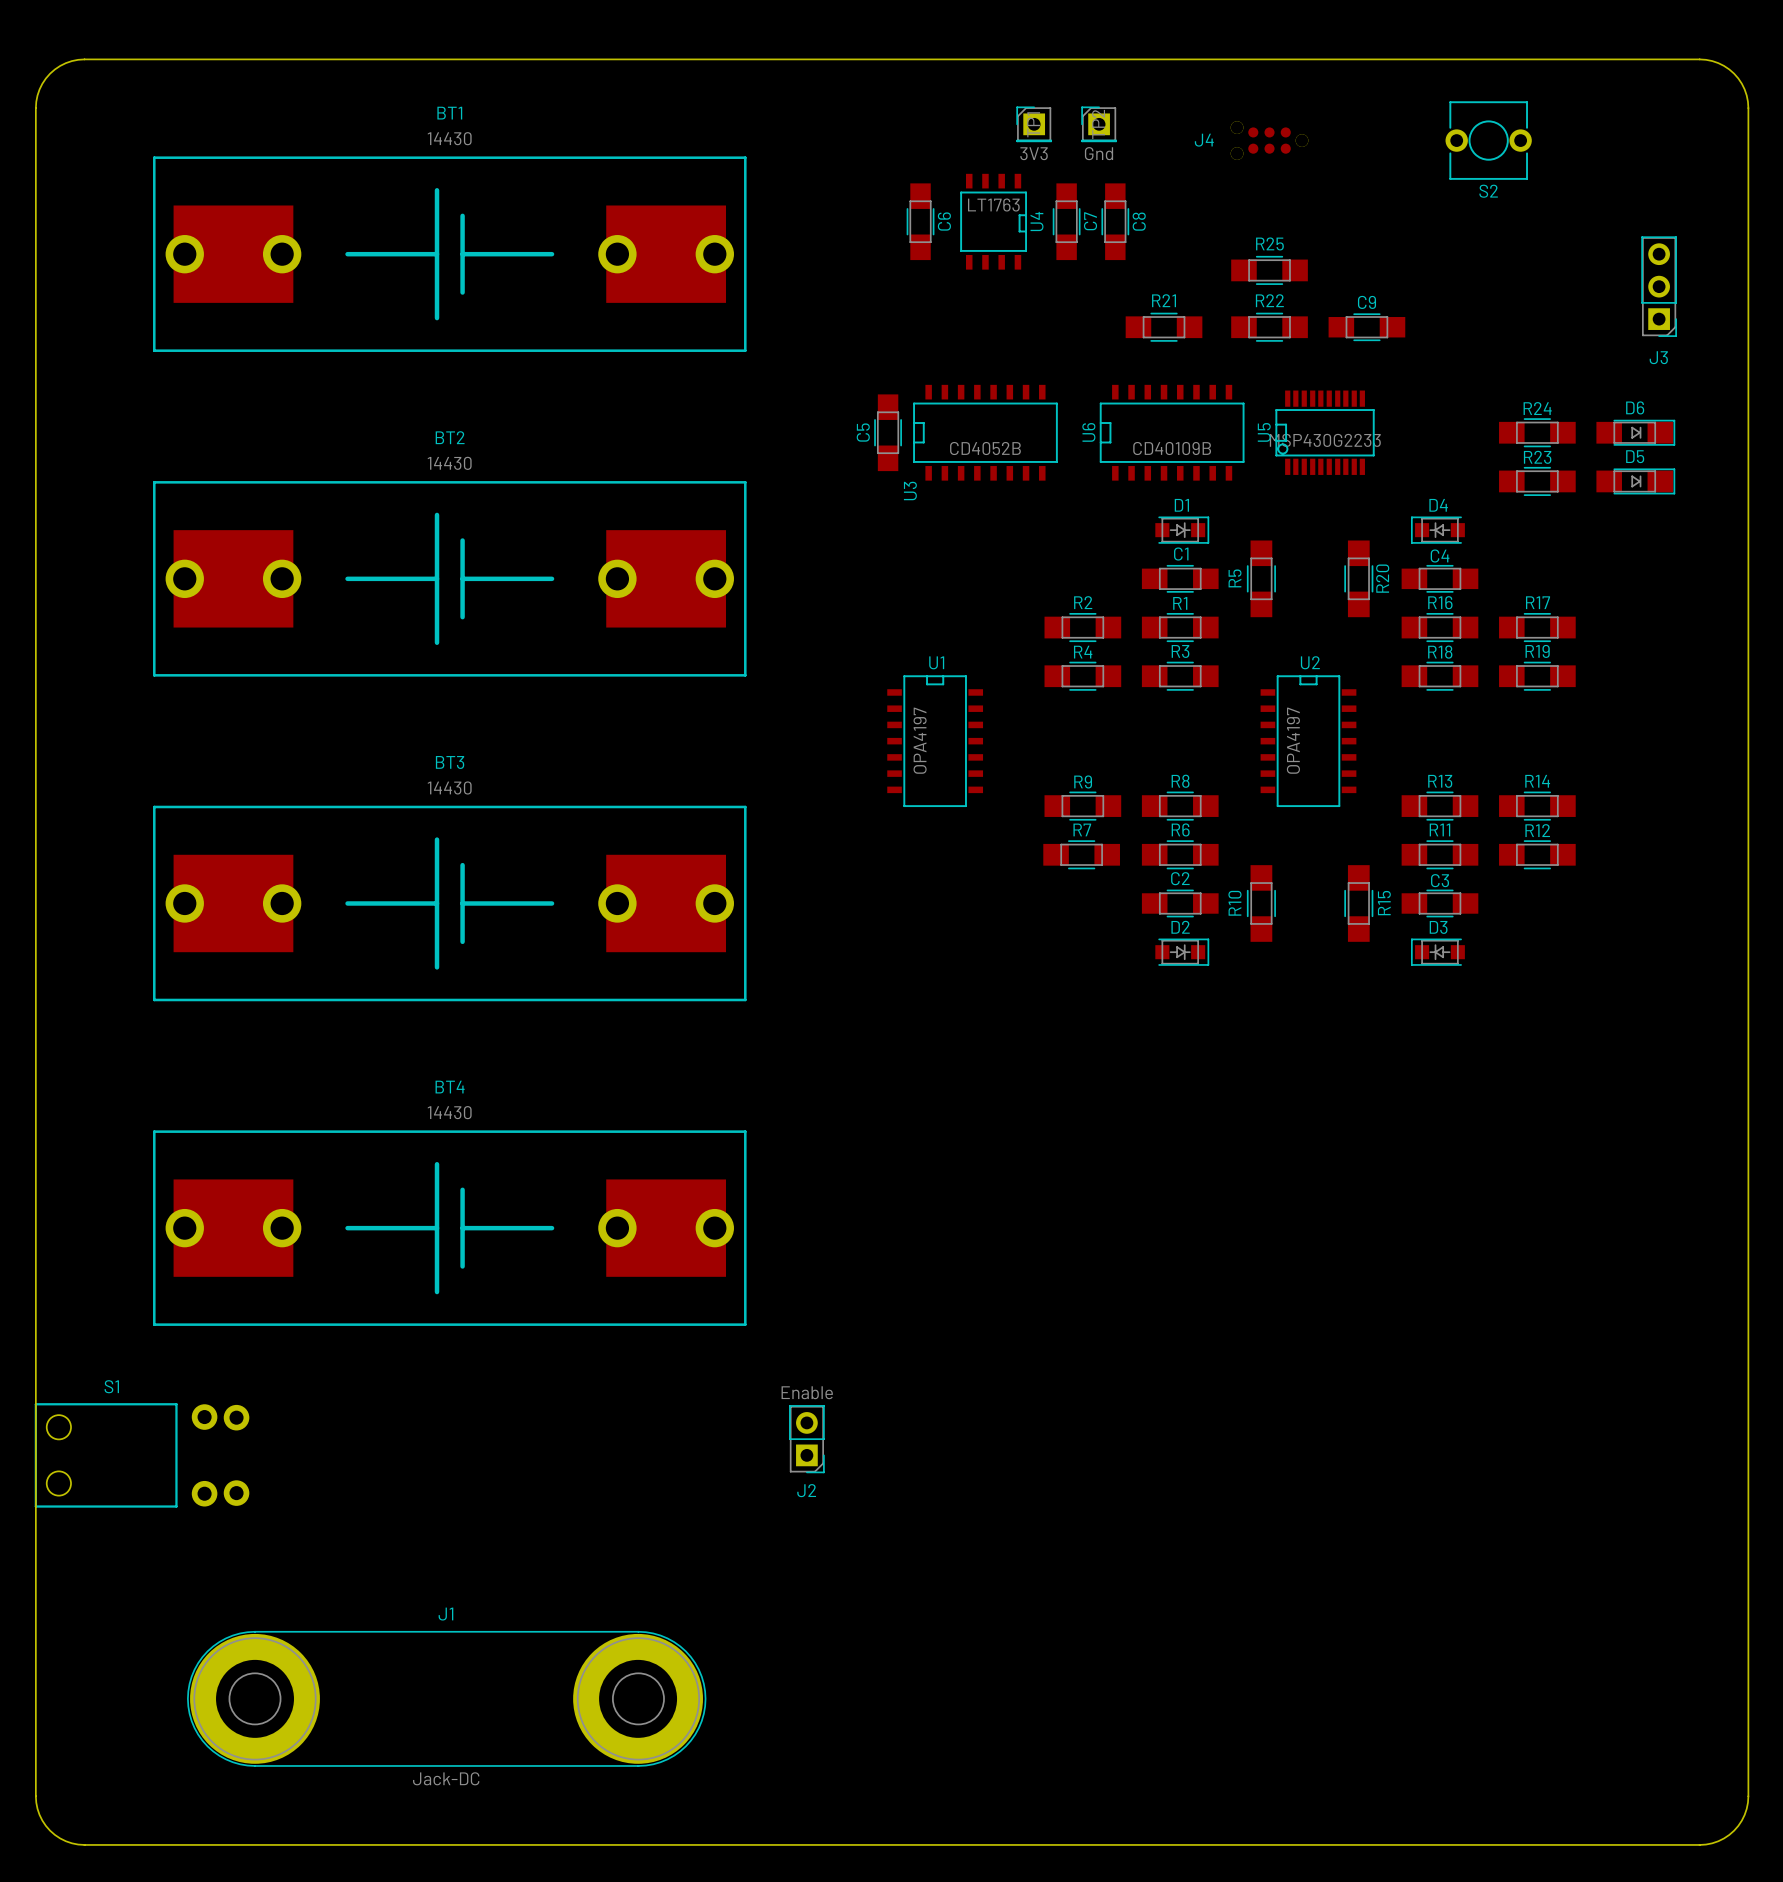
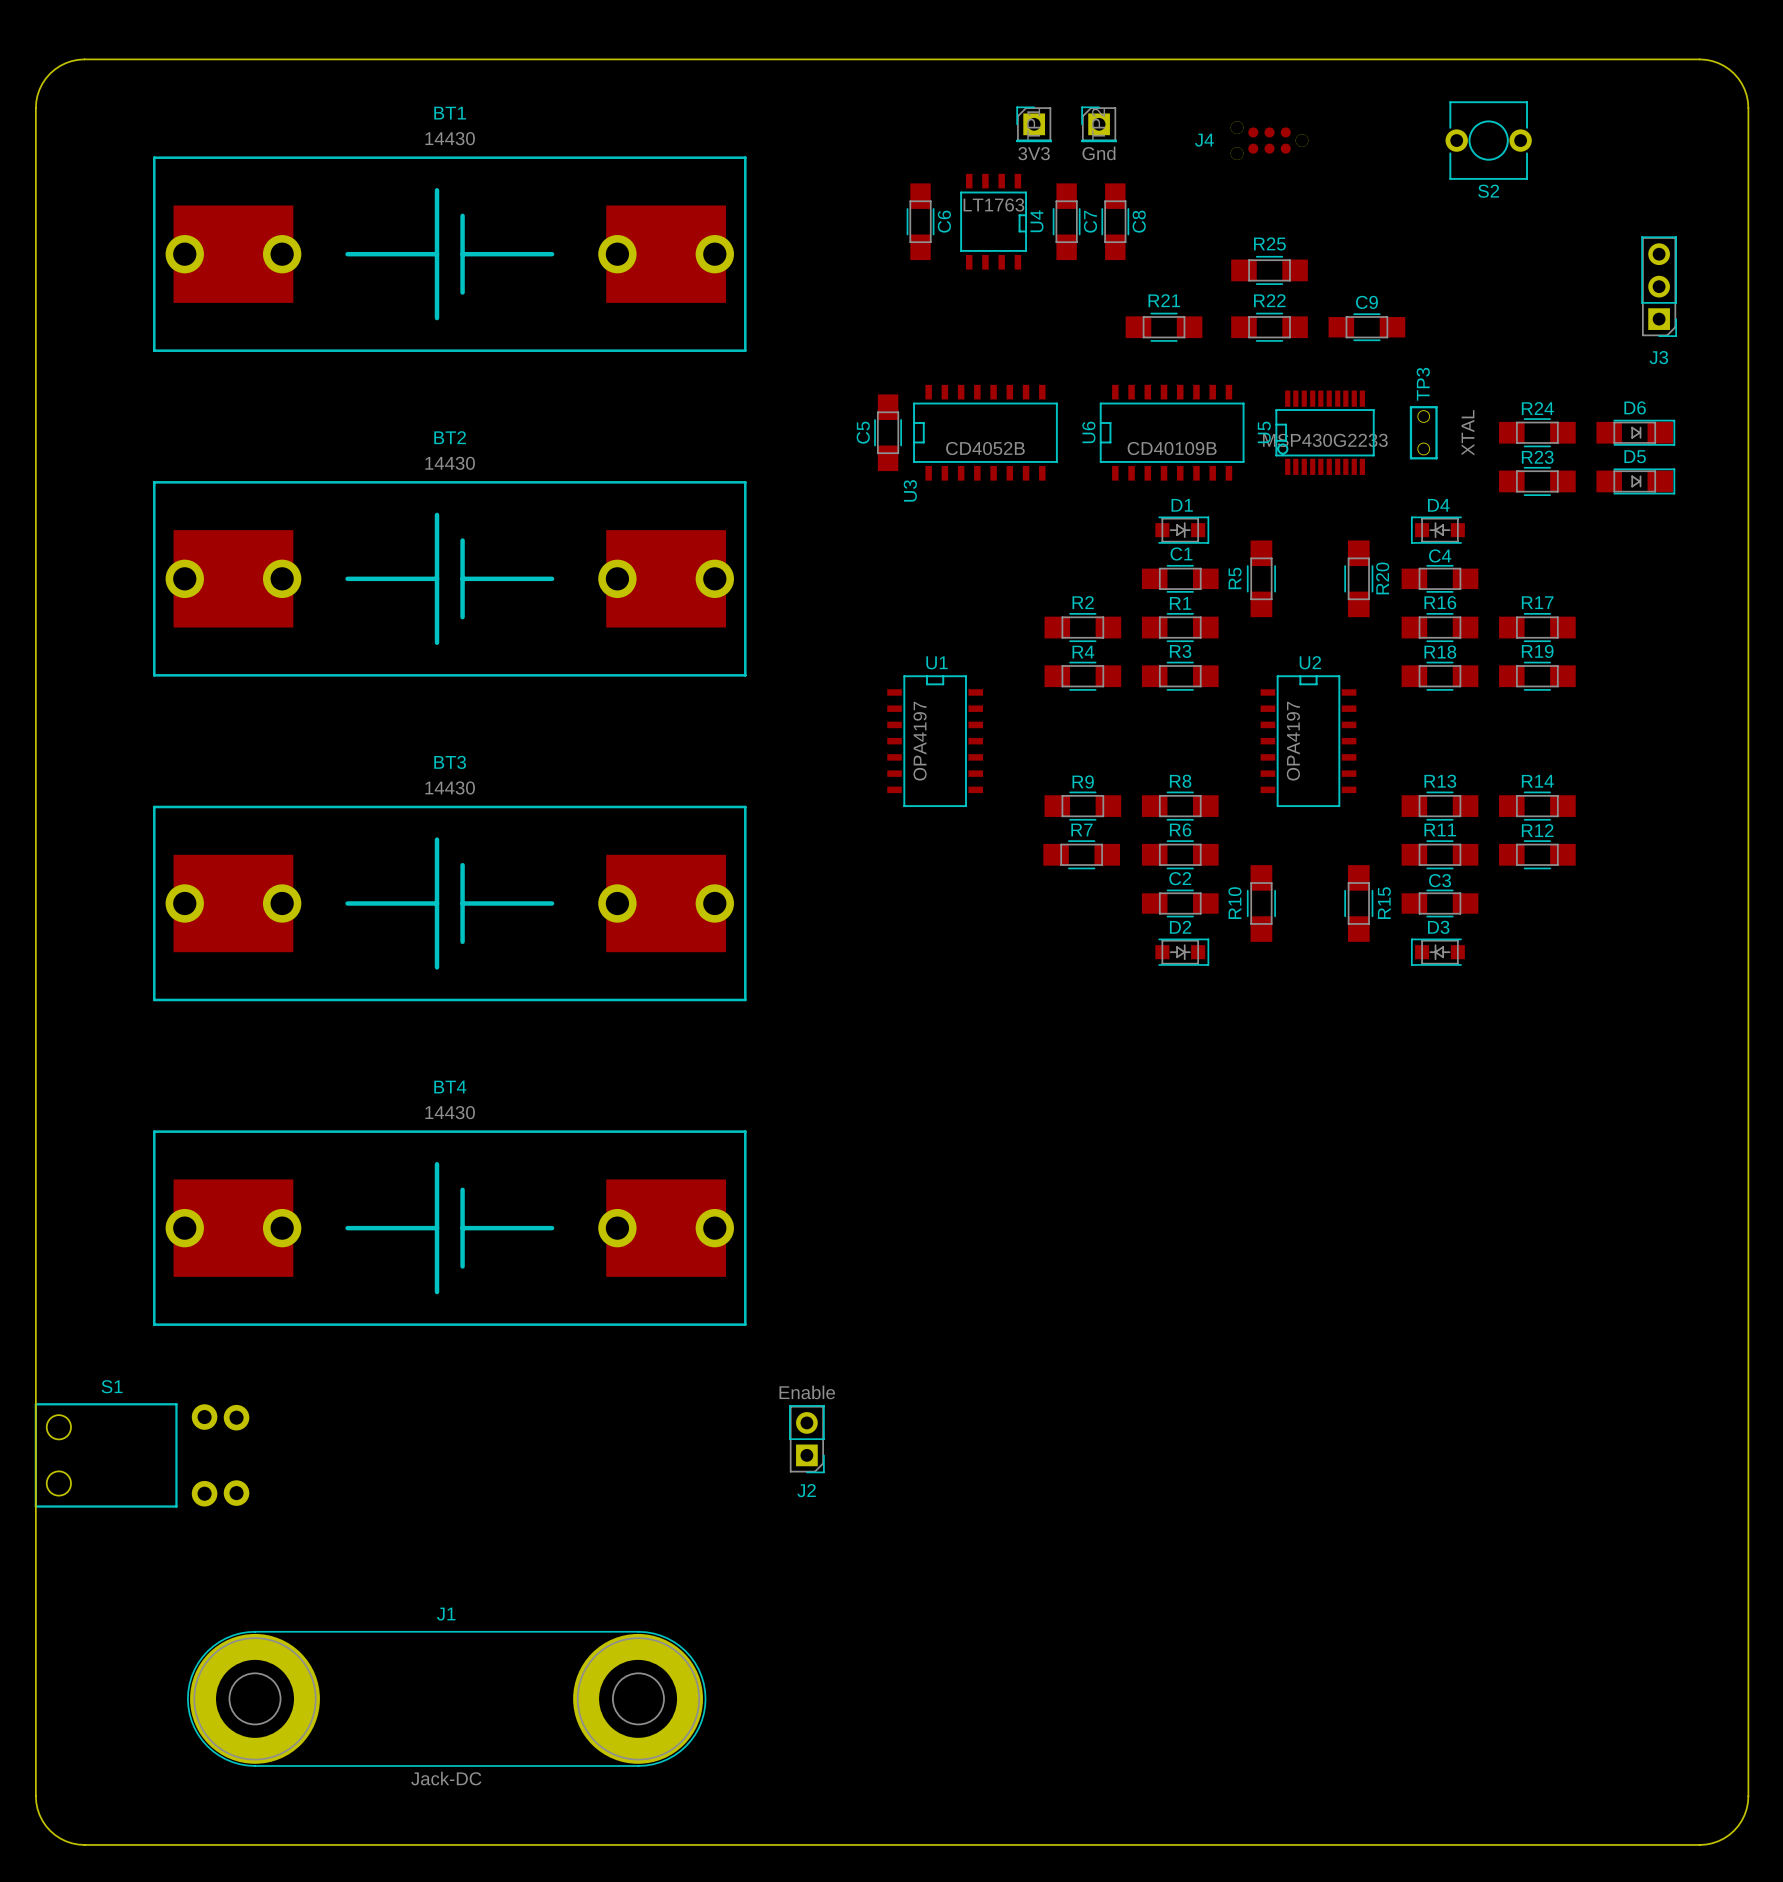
TP3: none -> XTAL (1423, 432)

